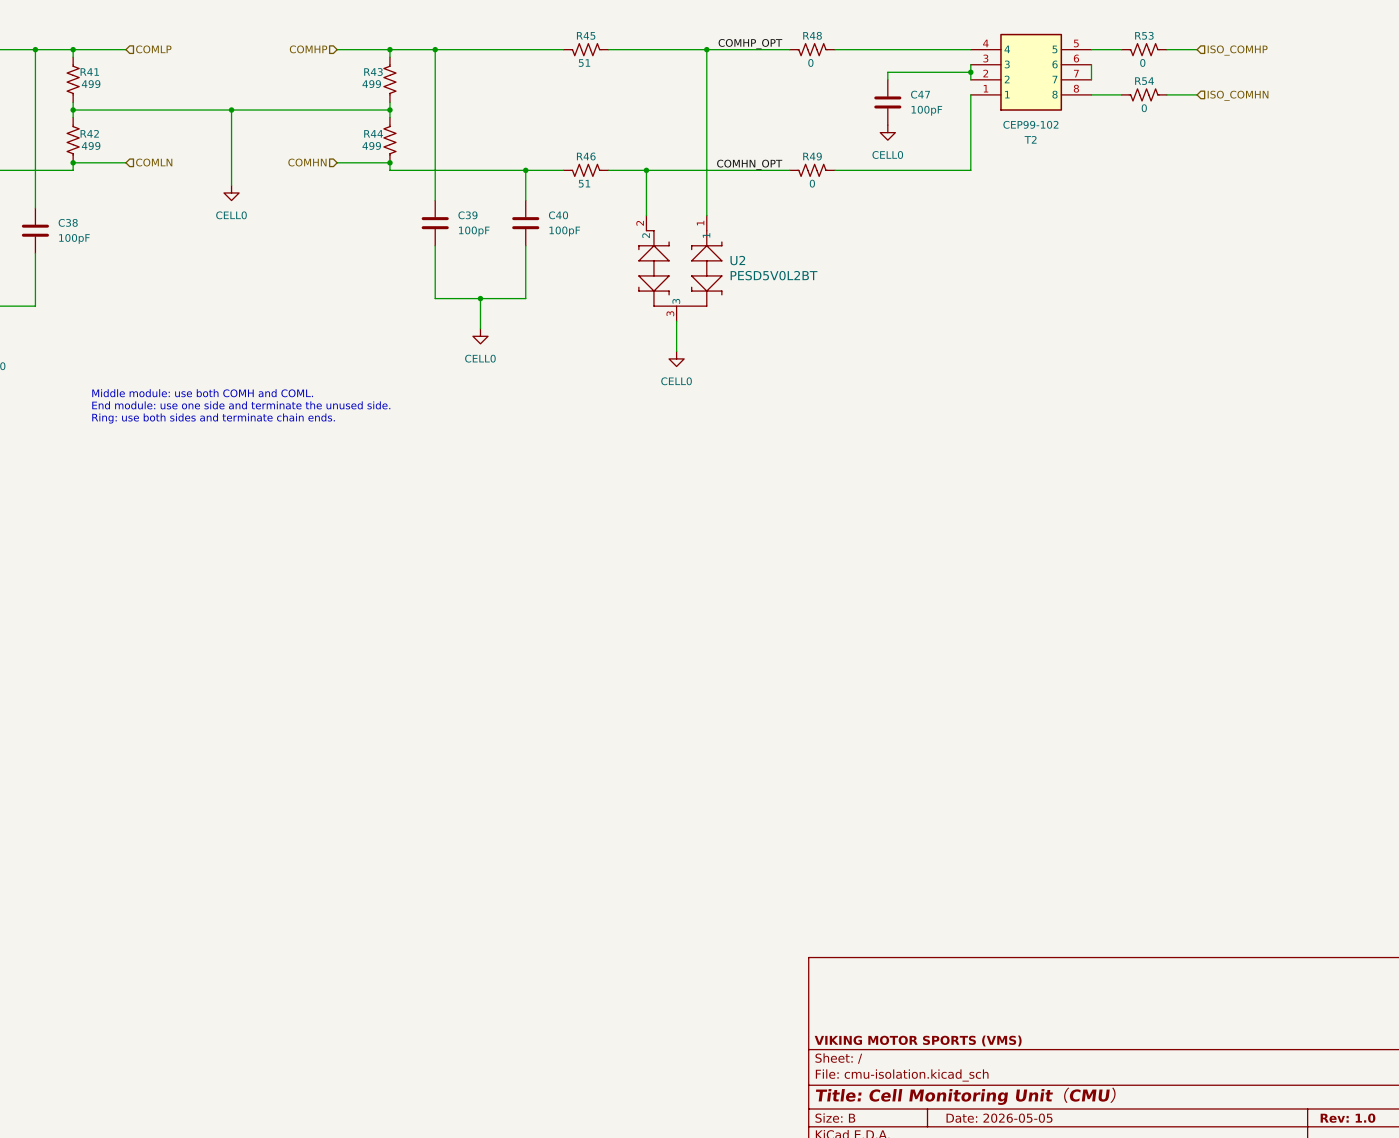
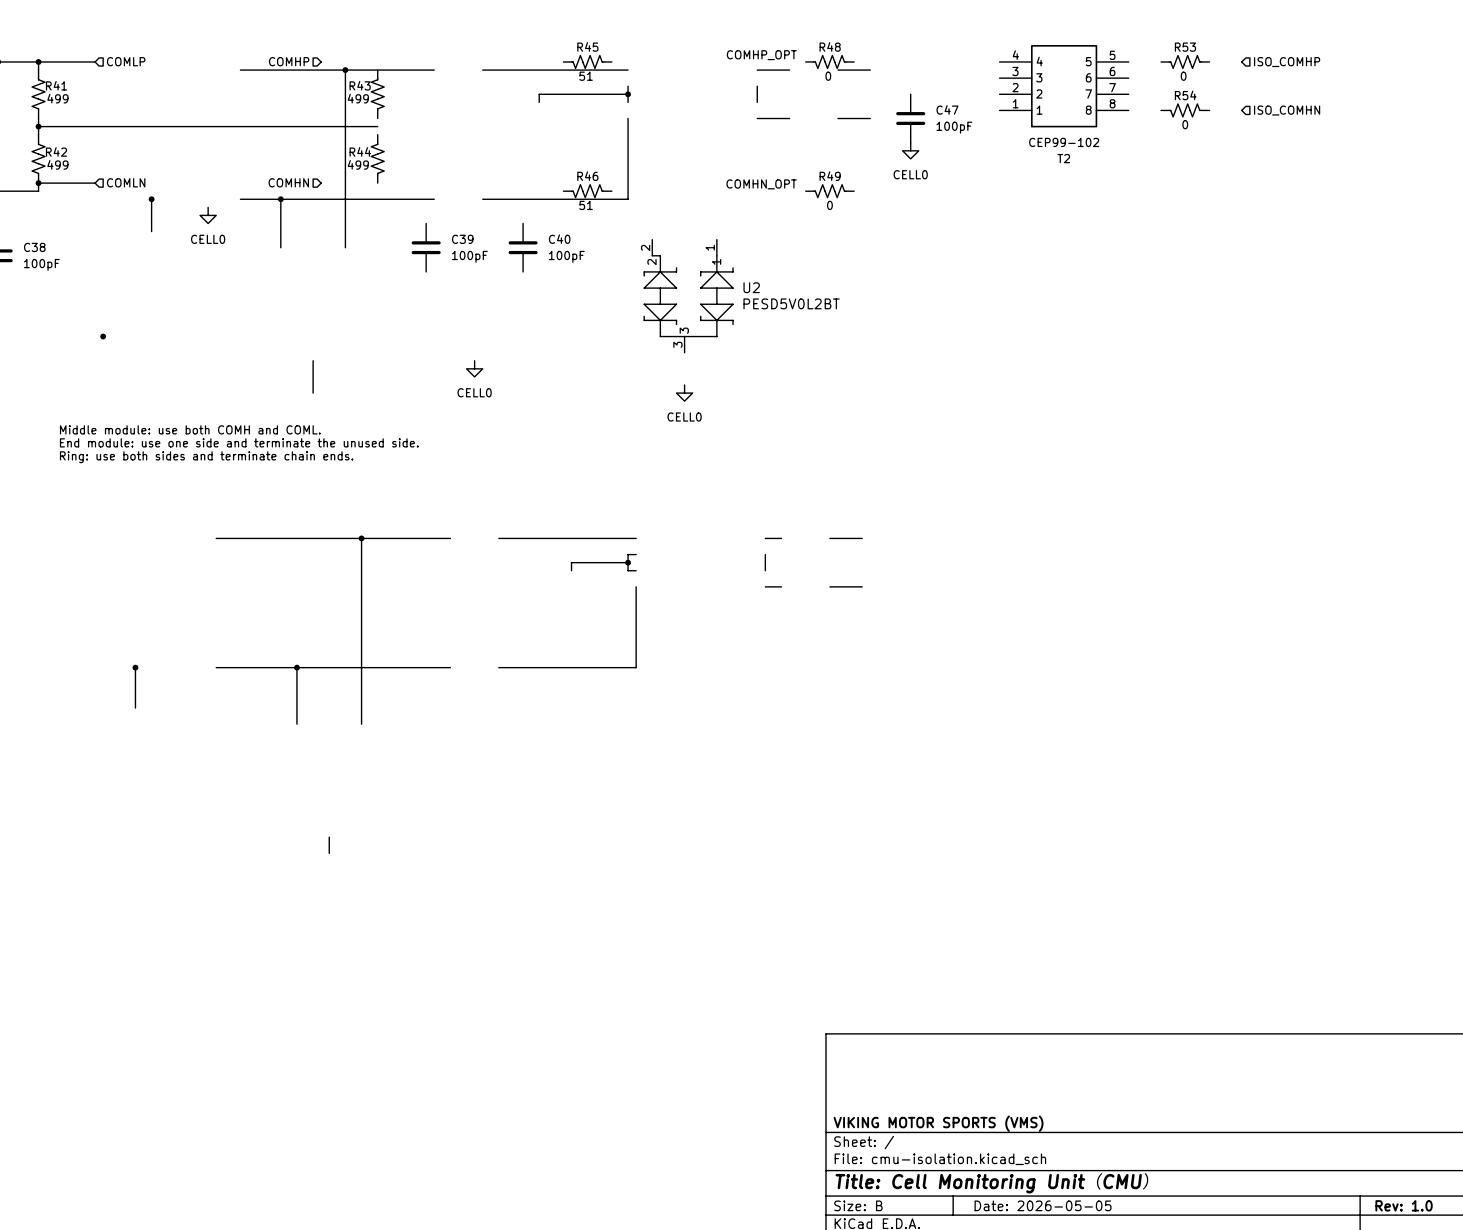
wire: (337, 49) (563, 49) -> none
wire: (389, 49) (389, 57) -> none
junction: (389, 49) -> none
wire: (435, 49) (435, 200) -> none
junction: (435, 49) -> none
wire: (608, 49) (789, 49) -> none
wire: (706, 49) (706, 215) -> none
junction: (706, 49) -> none
wire: (835, 49) (970, 49) -> none
wire: (1091, 49) (1121, 49) -> none
wire: (1166, 49) (1197, 49) -> none
wire: none -> (240, 70) (434, 70)
wire: none -> (345, 70) (345, 247)
junction: none -> (345, 70)
wire: none -> (482, 70) (628, 70)
wire: none -> (757, 70) (789, 70)
wire: none -> (838, 70) (870, 70)
wire: (970, 64) (970, 79) -> none
wire: (1091, 64) (1091, 79) -> none
wire: none -> (628, 86) (628, 102)
wire: none -> (757, 86) (757, 102)
wire: (970, 72) (887, 72) (887, 79) -> none
junction: (970, 72) -> none
wire: none -> (628, 94) (539, 94) (539, 102)
junction: none -> (628, 94)
wire: (970, 94) (970, 170) (835, 170) -> none
wire: (1091, 94) (1121, 94) -> none
wire: (1166, 94) (1197, 94) -> none
wire: (389, 102) (389, 117) -> none
wire: none -> (628, 118) (628, 199) (482, 199)
wire: none -> (757, 118) (789, 118)
wire: none -> (838, 118) (870, 118)
wire: (231, 110) (231, 185) -> none
junction: (231, 110) -> none
junction: (389, 110) -> none
wire: (337, 162) (389, 162) (389, 170) (563, 170) -> none
junction: (389, 162) -> none
wire: (525, 170) (525, 200) -> none
junction: (525, 170) -> none
wire: (608, 170) (789, 170) -> none
wire: (646, 170) (646, 215) -> none
junction: (646, 170) -> none
wire: none -> (151, 199) (151, 231)
junction: none -> (151, 199)
wire: none -> (240, 199) (434, 199)
wire: none -> (280, 199) (280, 247)
junction: none -> (280, 199)
wire: (435, 245) (435, 298) (525, 298) (525, 245) -> none
wire: (480, 298) (480, 328) -> none
junction: (480, 298) -> none
junction: none -> (103, 336)
wire: (676, 321) (676, 351) -> none
wire: none -> (313, 360) (313, 393)
wire: none -> (216, 538) (450, 538)
wire: none -> (361, 538) (361, 724)
junction: none -> (361, 538)
wire: none -> (498, 538) (636, 538)
wire: none -> (765, 538) (781, 538)
wire: none -> (829, 538) (862, 538)
wire: none -> (636, 554) (628, 554) (628, 570) (636, 570)
wire: none -> (765, 554) (765, 570)
wire: none -> (628, 562) (571, 562) (571, 570)
junction: none -> (628, 562)
wire: none -> (636, 586) (636, 667) (498, 667)
wire: none -> (765, 586) (781, 586)
wire: none -> (829, 586) (862, 586)
wire: none -> (135, 667) (135, 708)
junction: none -> (135, 667)
wire: none -> (216, 667) (450, 667)
wire: none -> (296, 667) (296, 724)
junction: none -> (296, 667)
wire: none -> (329, 837) (329, 853)

